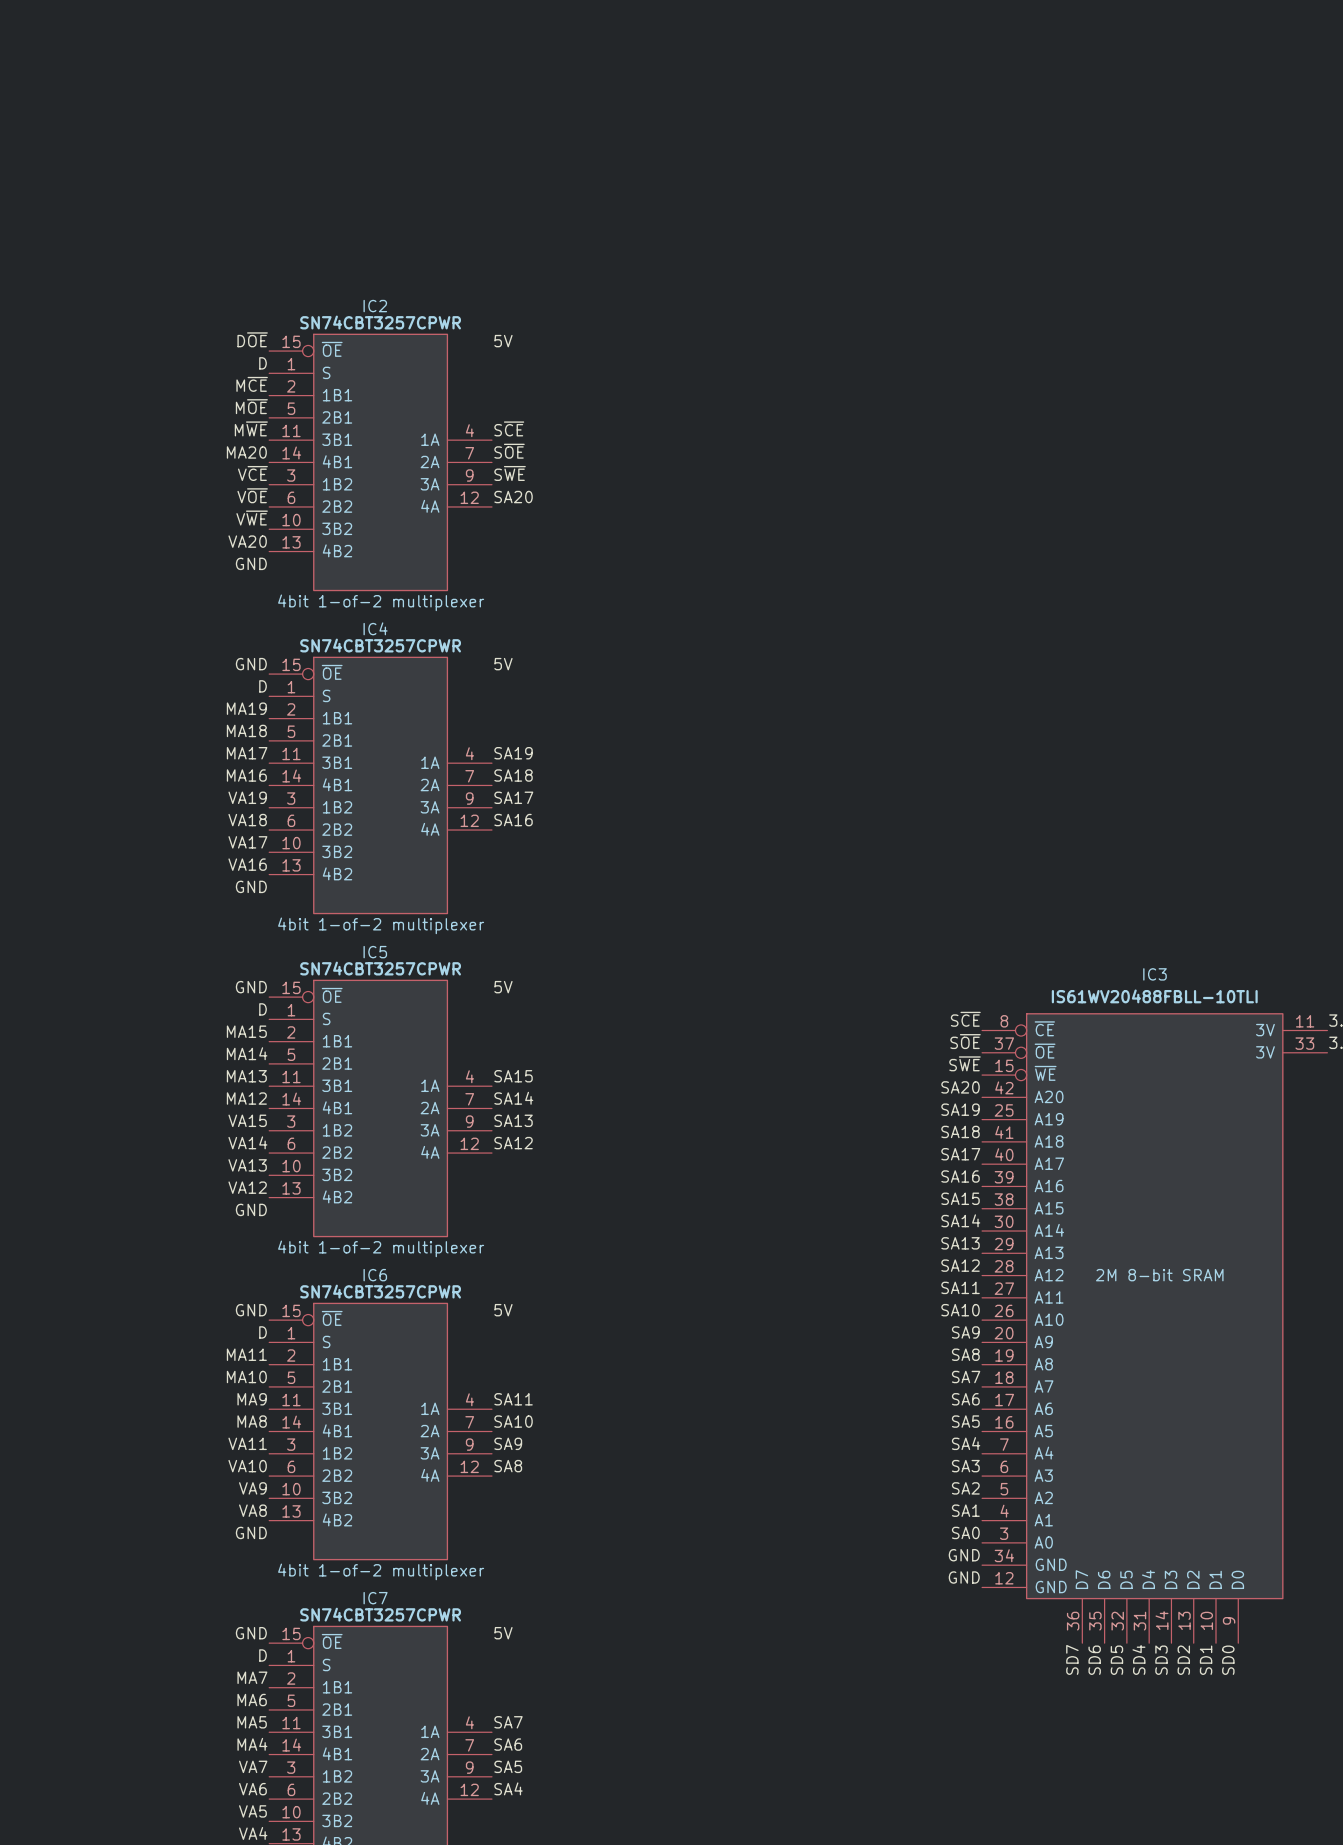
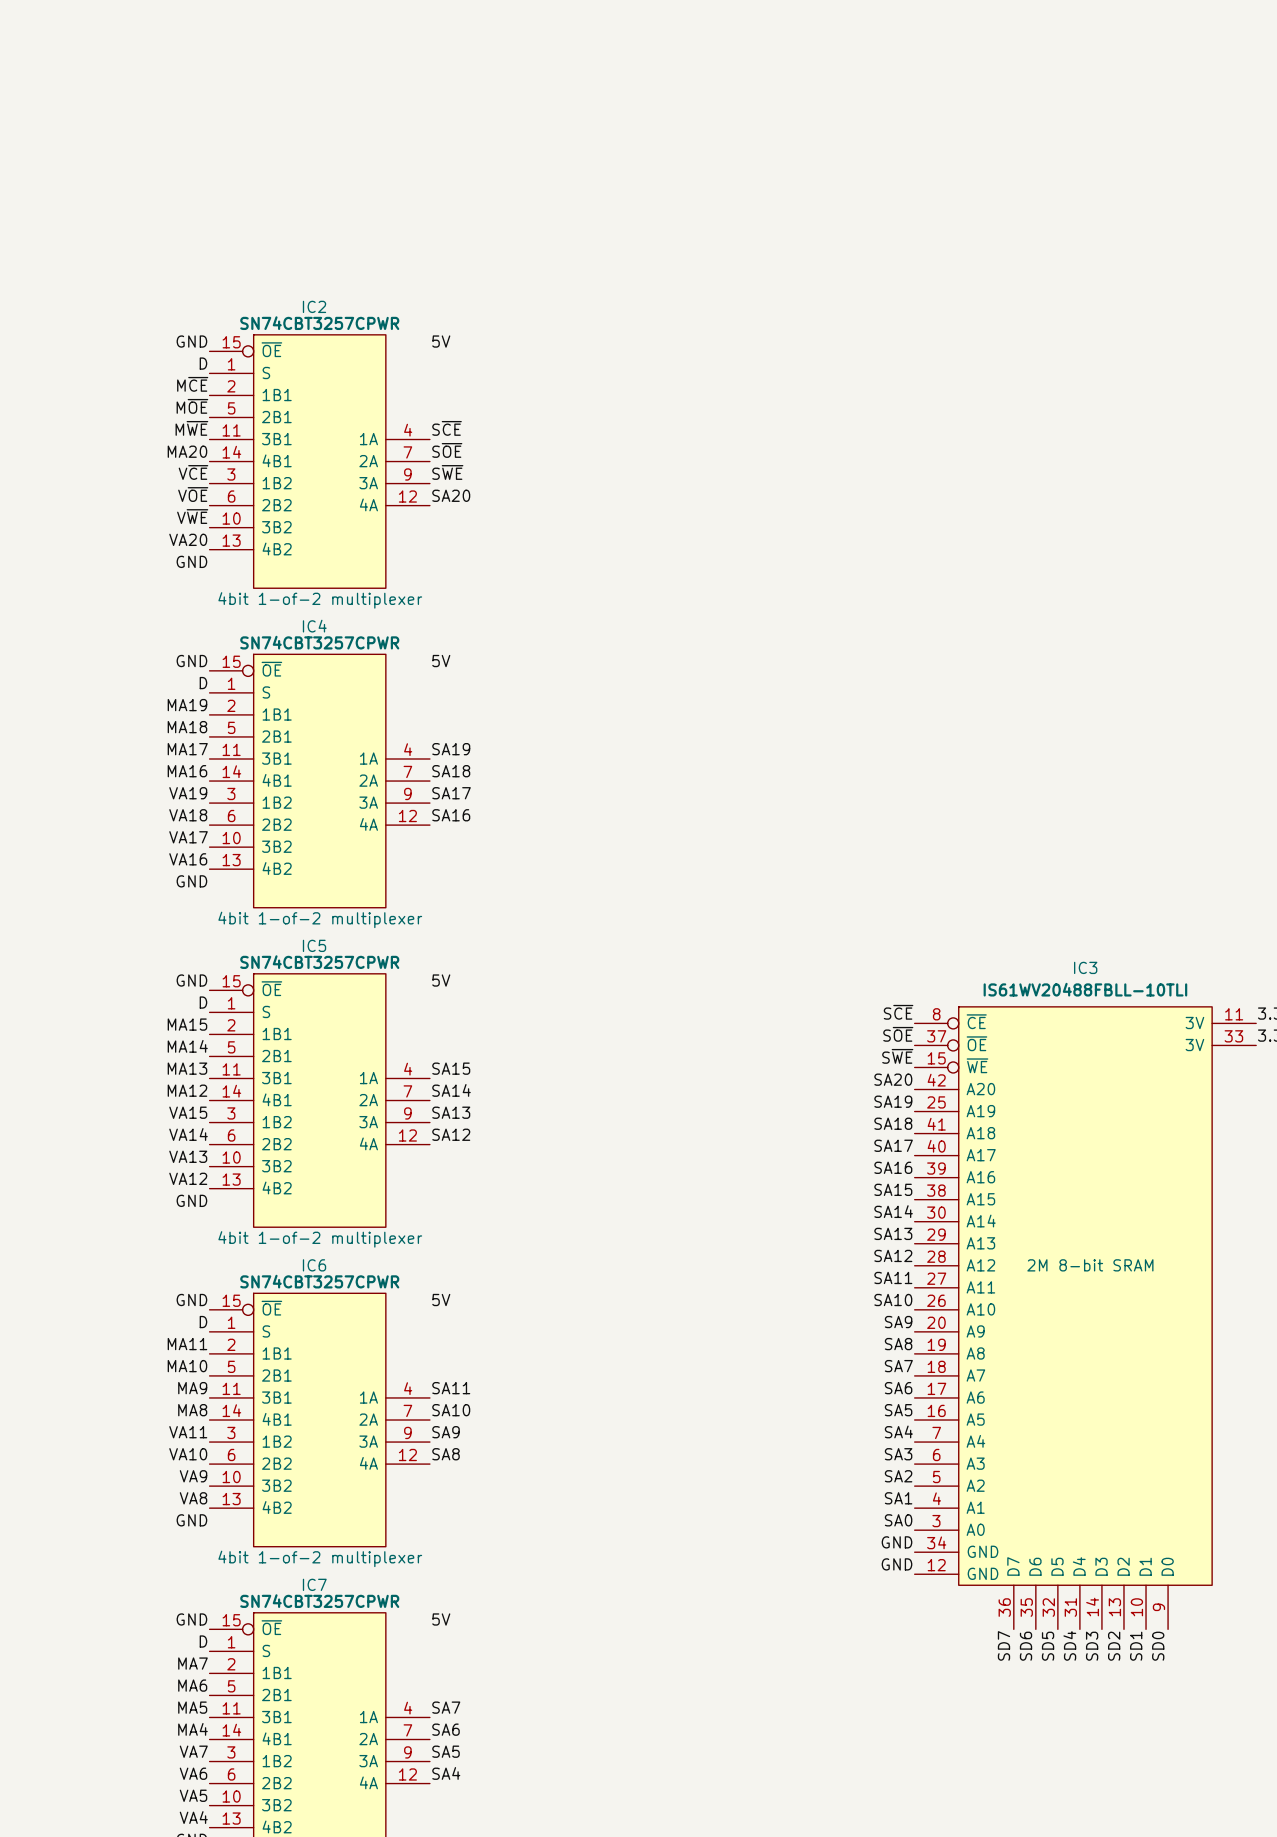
label: D~{OE} (252, 339) -> GND (191, 341)

